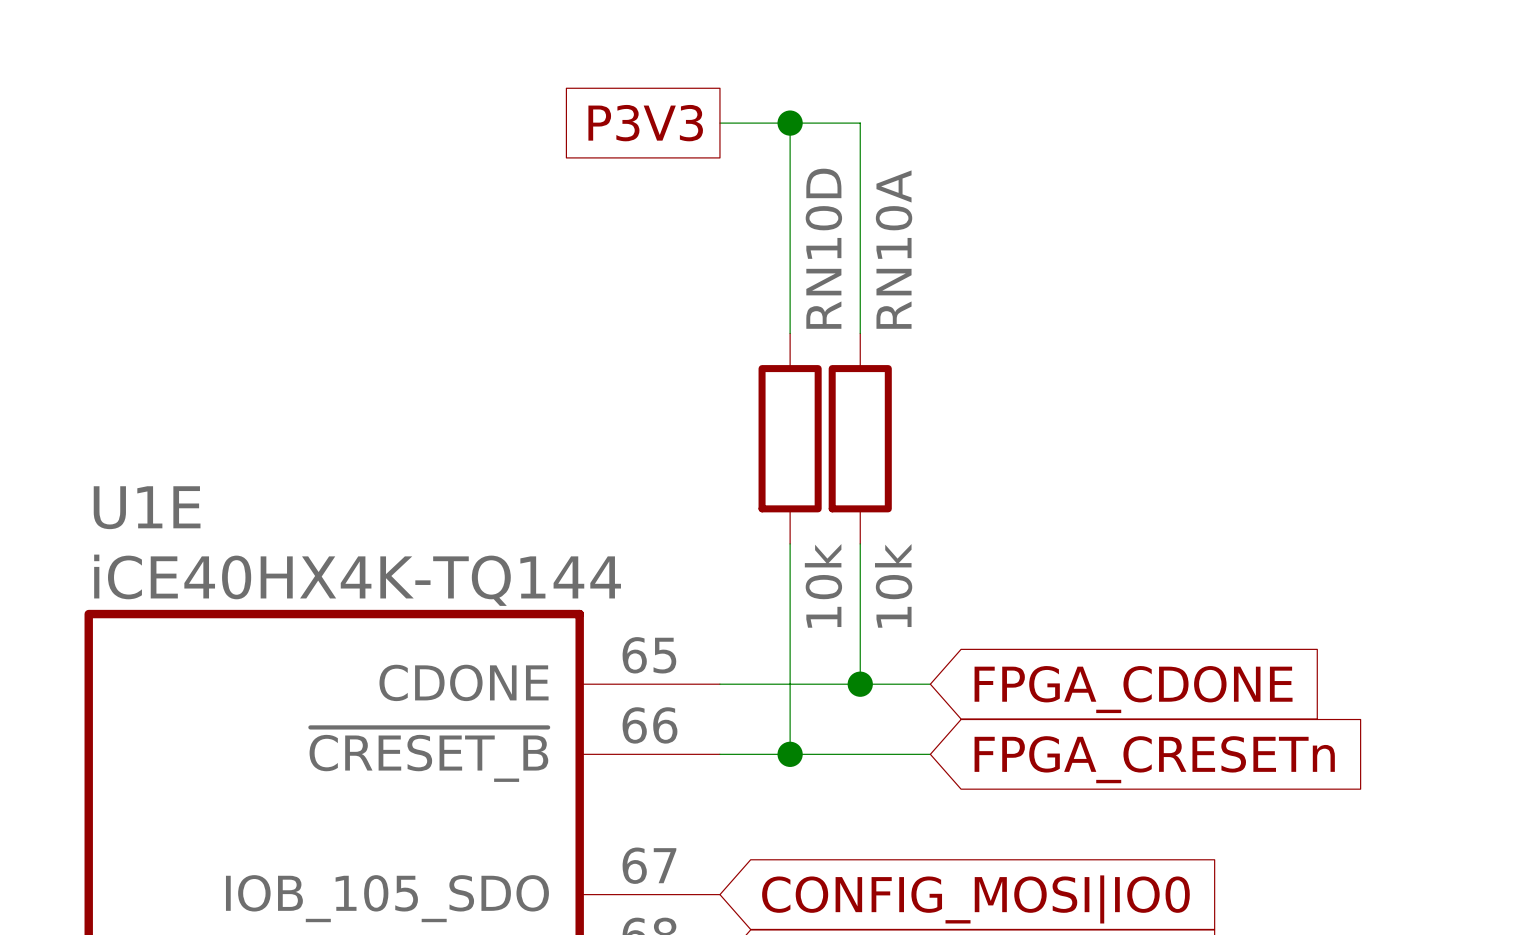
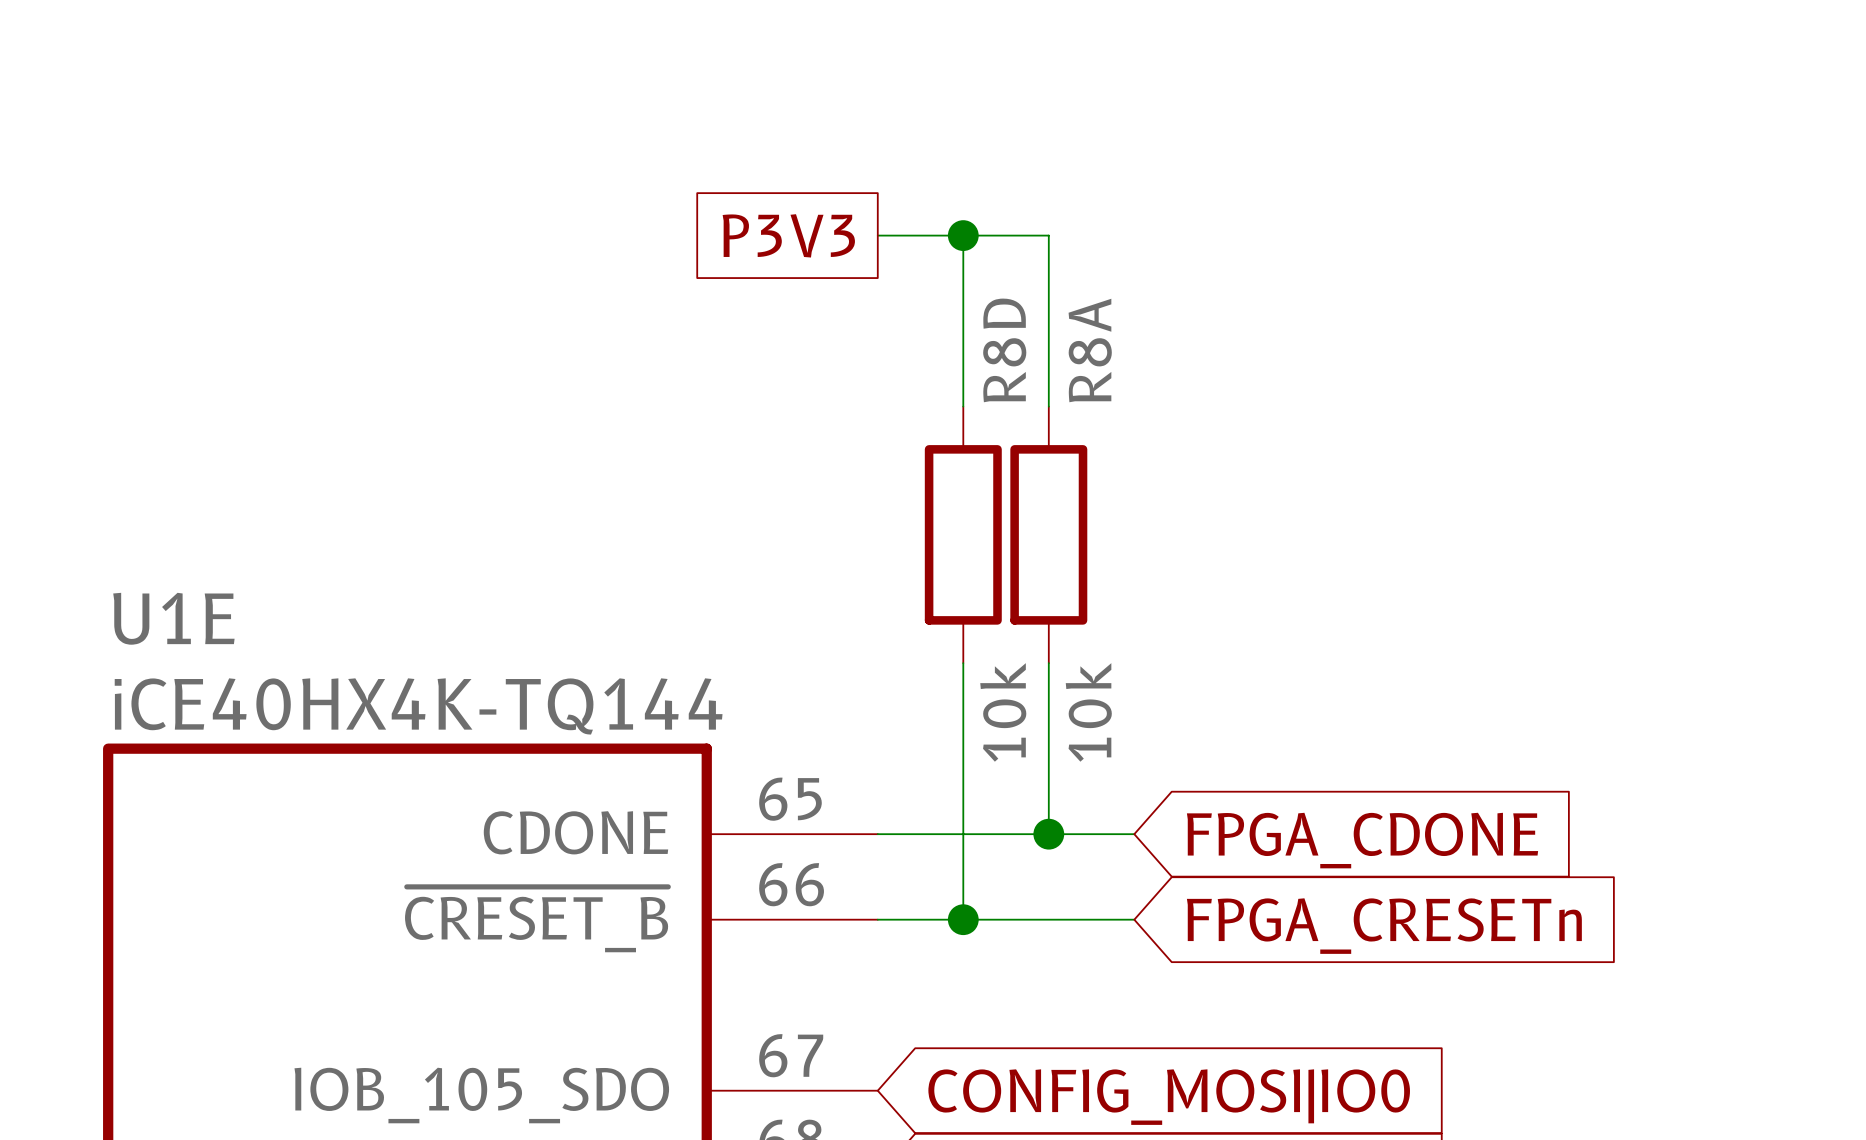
global label position: P3V3 (645, 123) -> P3V3 (788, 235)
wire: (719, 123) (860, 123) (860, 193) -> (877, 235) (1048, 235)
wire: (790, 123) (790, 193) -> none
junction position: (790, 123) -> (963, 235)
RN10D name: RN10D (823, 248) -> R8D (1004, 350)
RN10A name: RN10A (894, 249) -> R8A (1090, 350)

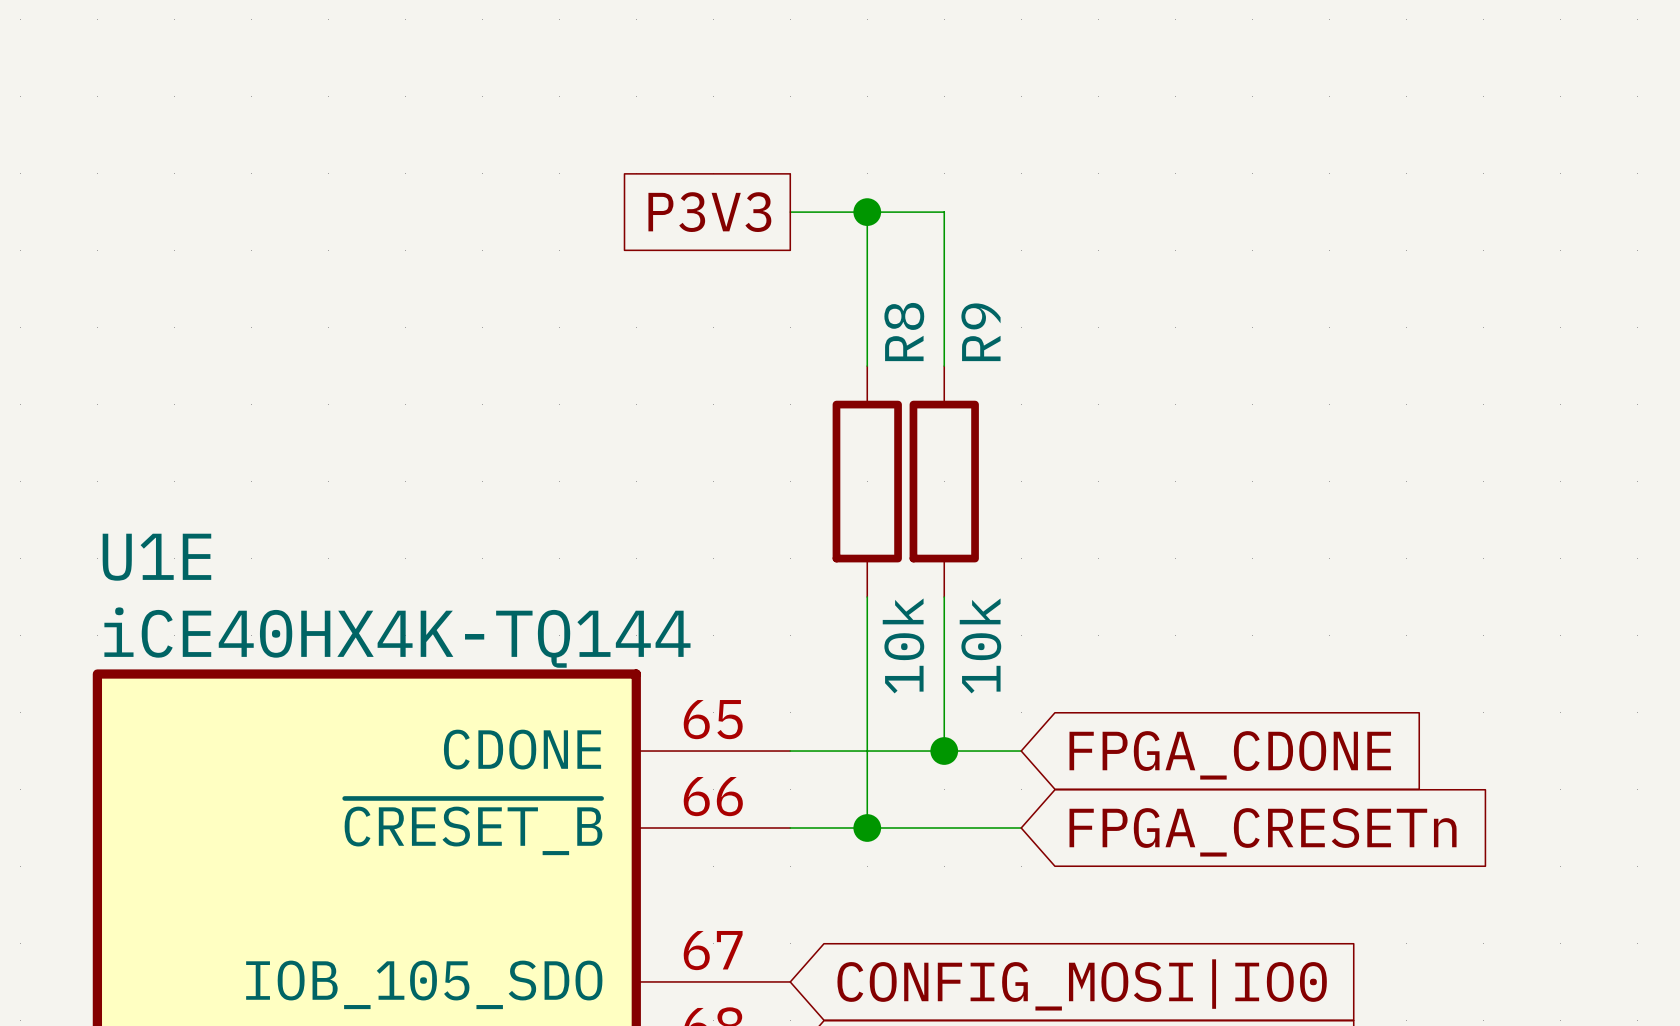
R8D name: R8D (1004, 350) -> R8 (904, 332)
R8A name: R8A (1090, 350) -> R9 (980, 332)

